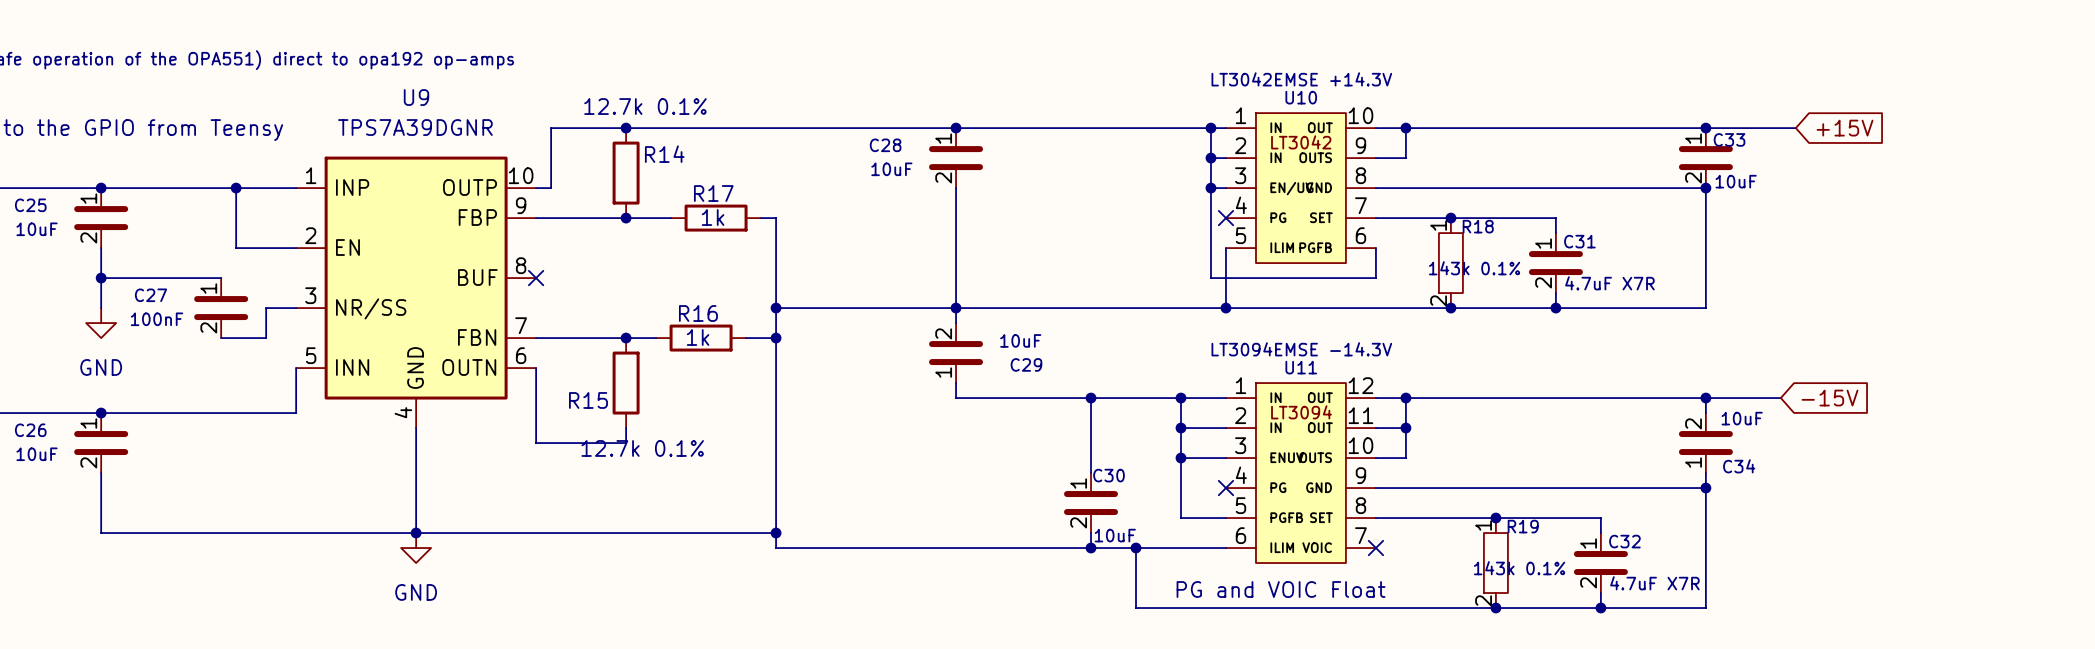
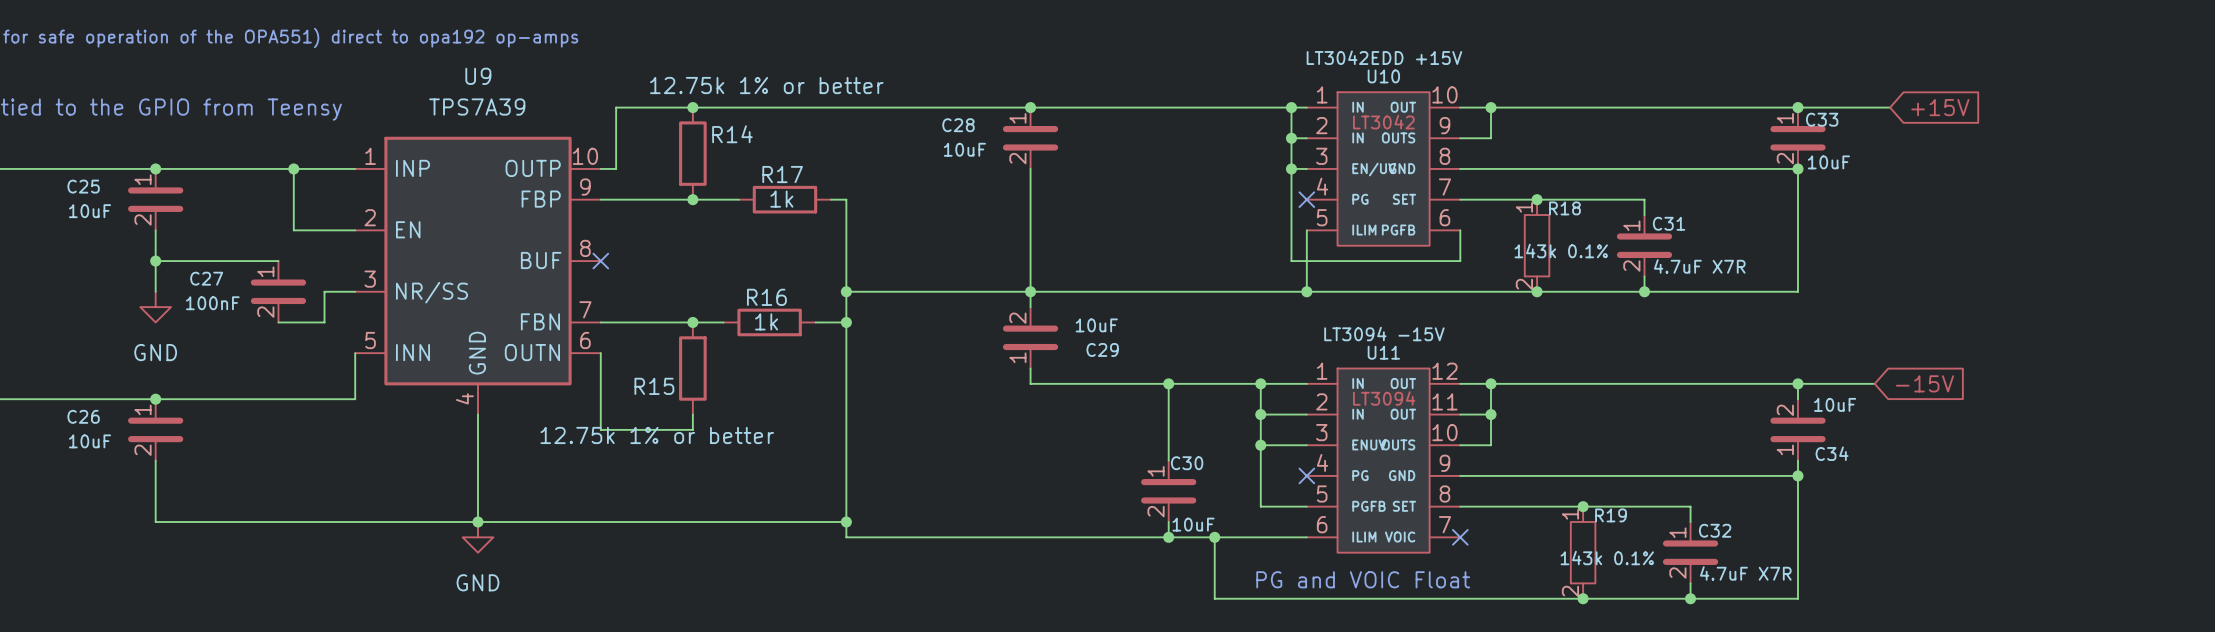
U10 value: LT3042EMSE +14.3V (1301, 79) -> LT3042EDD +15V (1384, 57)
R14 value: 12.7k 0.1% (645, 106) -> 12.75k 1% or better (766, 85)
U9 value: TPS7A39DGNR (415, 127) -> TPS7A39 (477, 107)
U11 value: LT3094EMSE -14.3V (1301, 349) -> LT3094 -15V (1384, 334)
R15 value: 12.7k 0.1% (642, 448) -> 12.75k 1% or better (657, 435)

